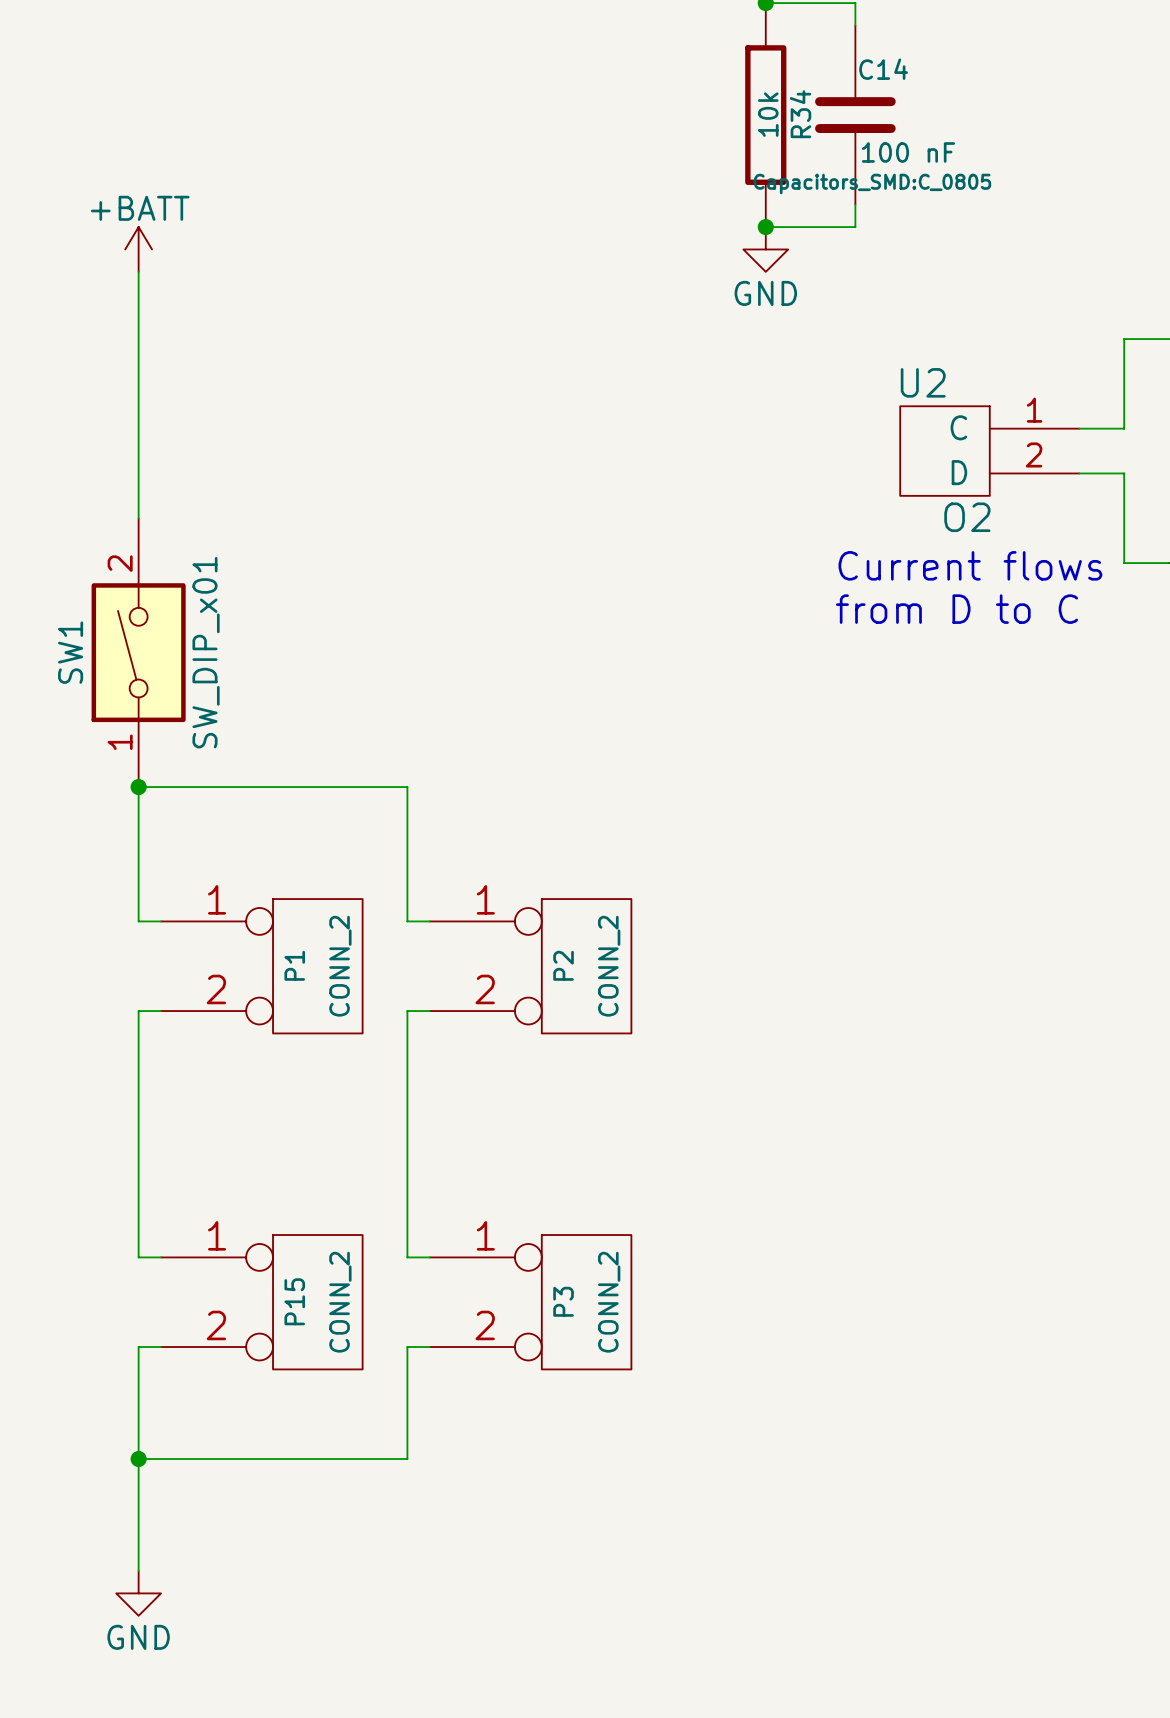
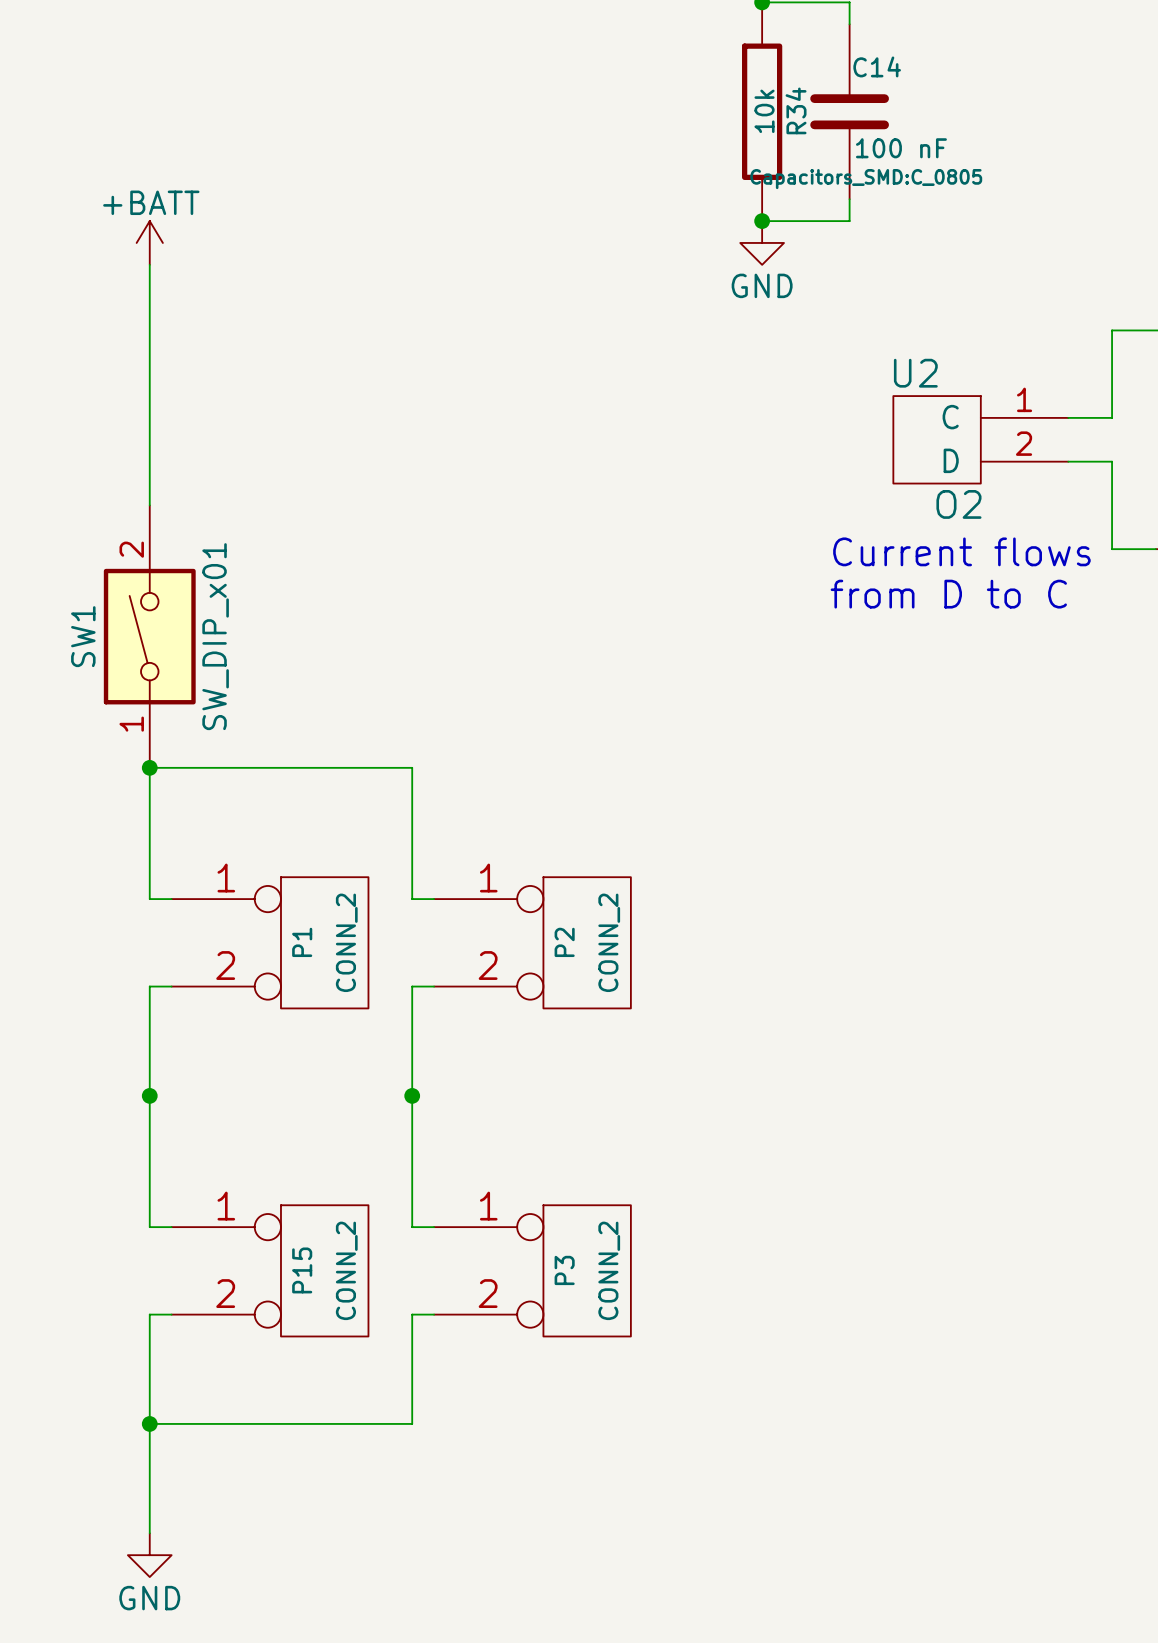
junction: none -> (149, 1095)
junction: none -> (412, 1095)

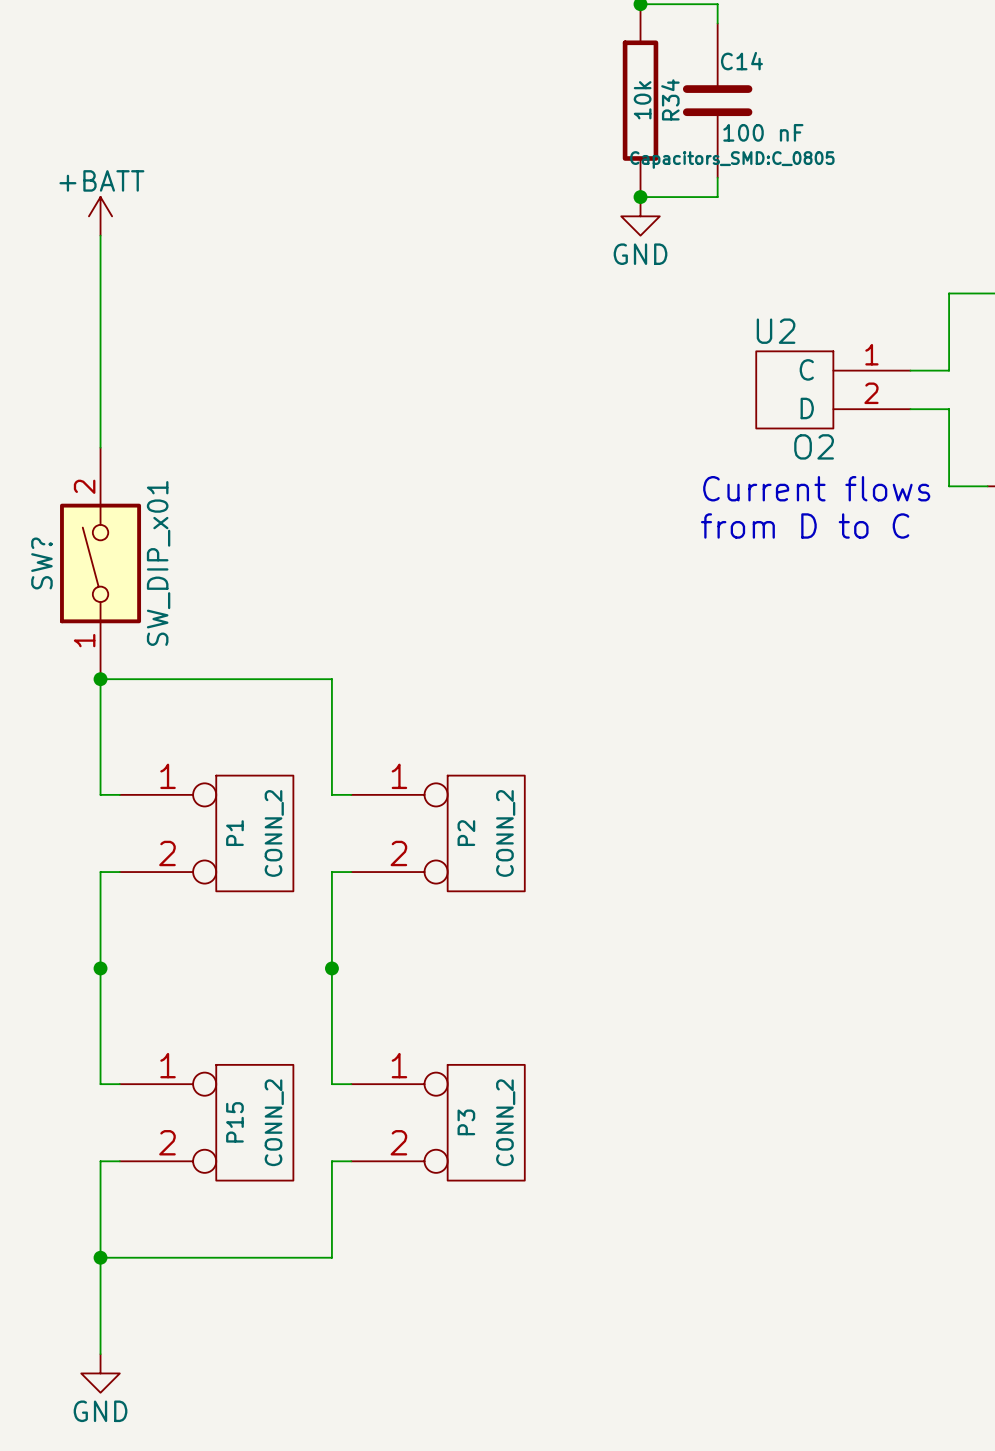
SW1 name: SW1 (83, 636) -> SW? (41, 563)

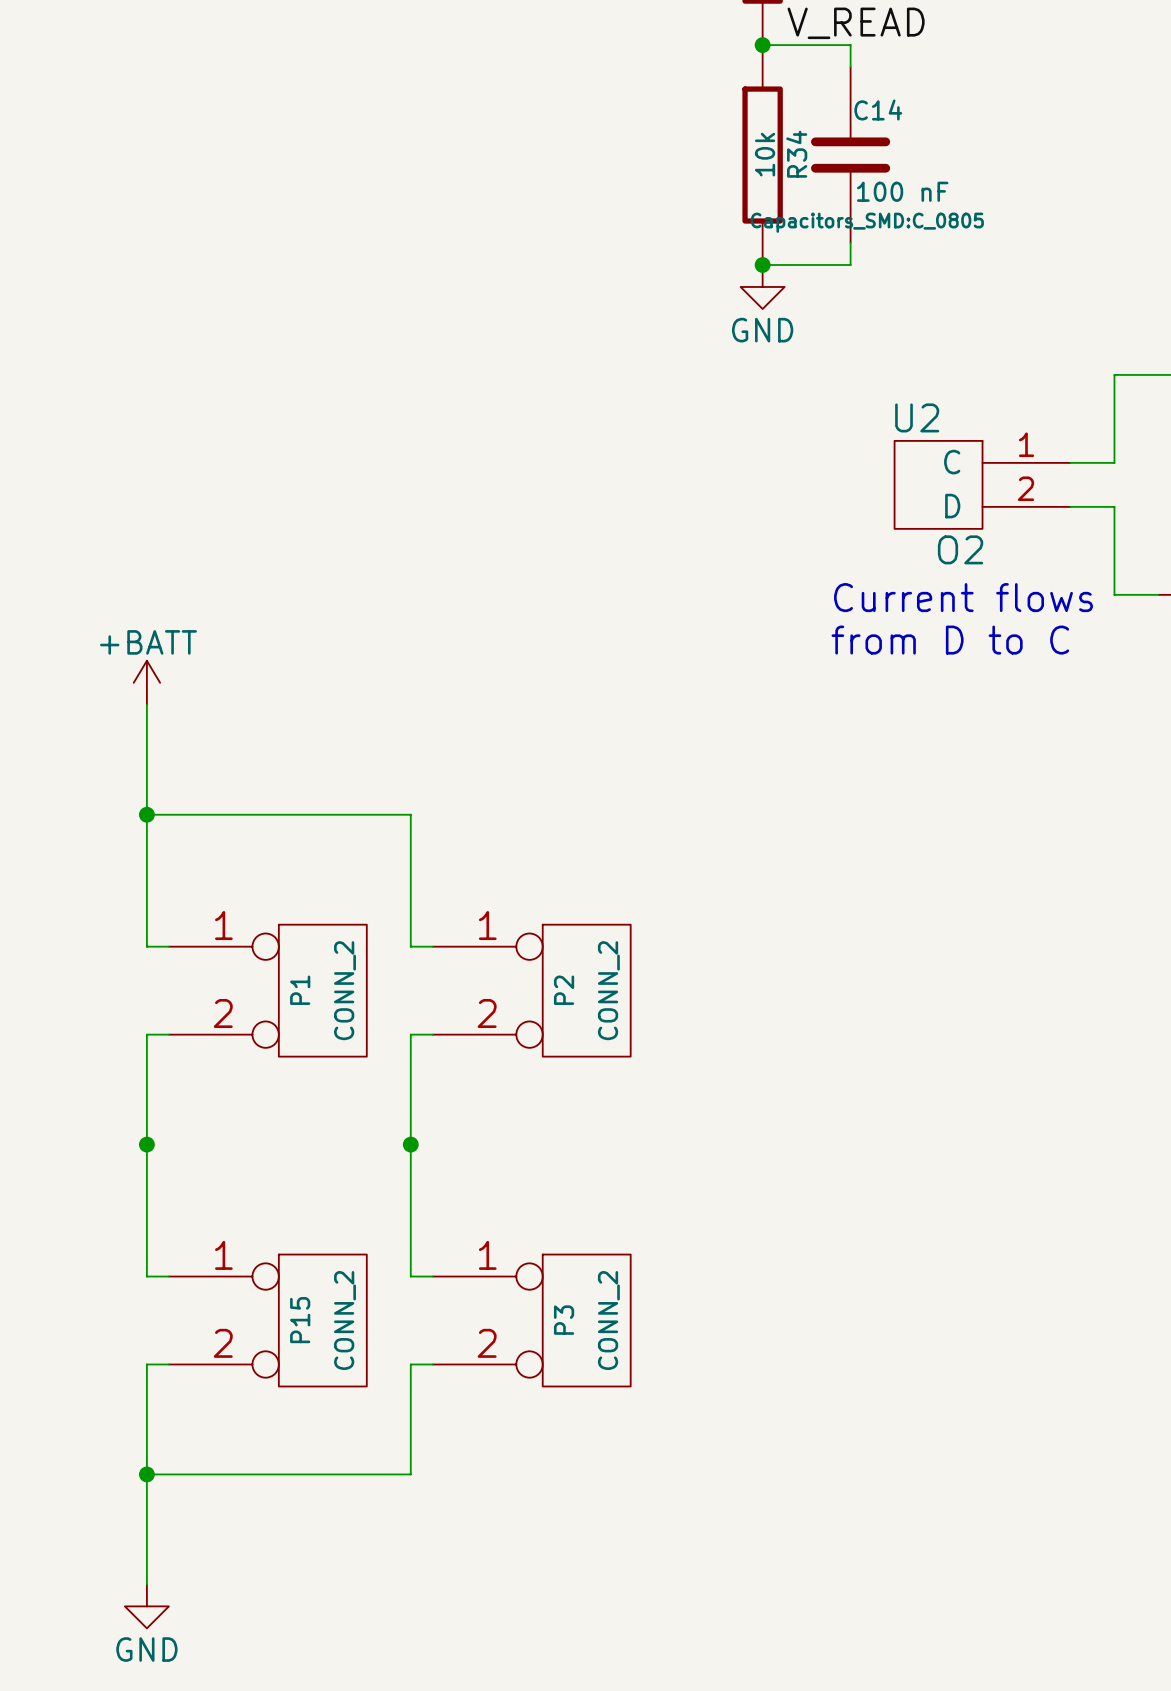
power symbol position: +BATT (100, 216) -> +BATT (146, 682)
wire: (100, 235) (100, 447) -> none
SW?: SW_DIP_x01 (100, 563) -> none

